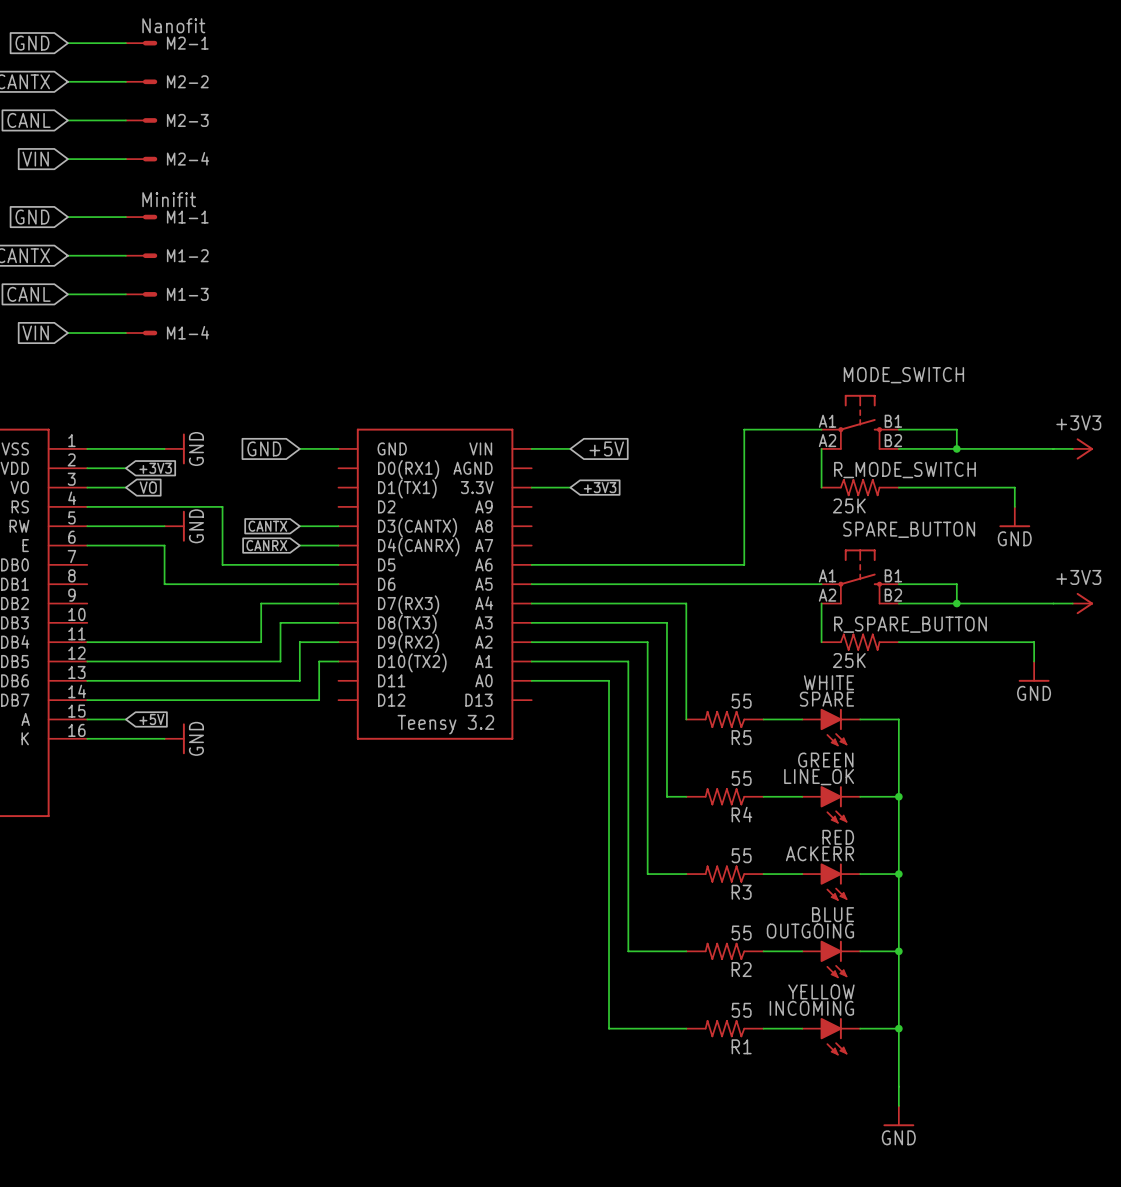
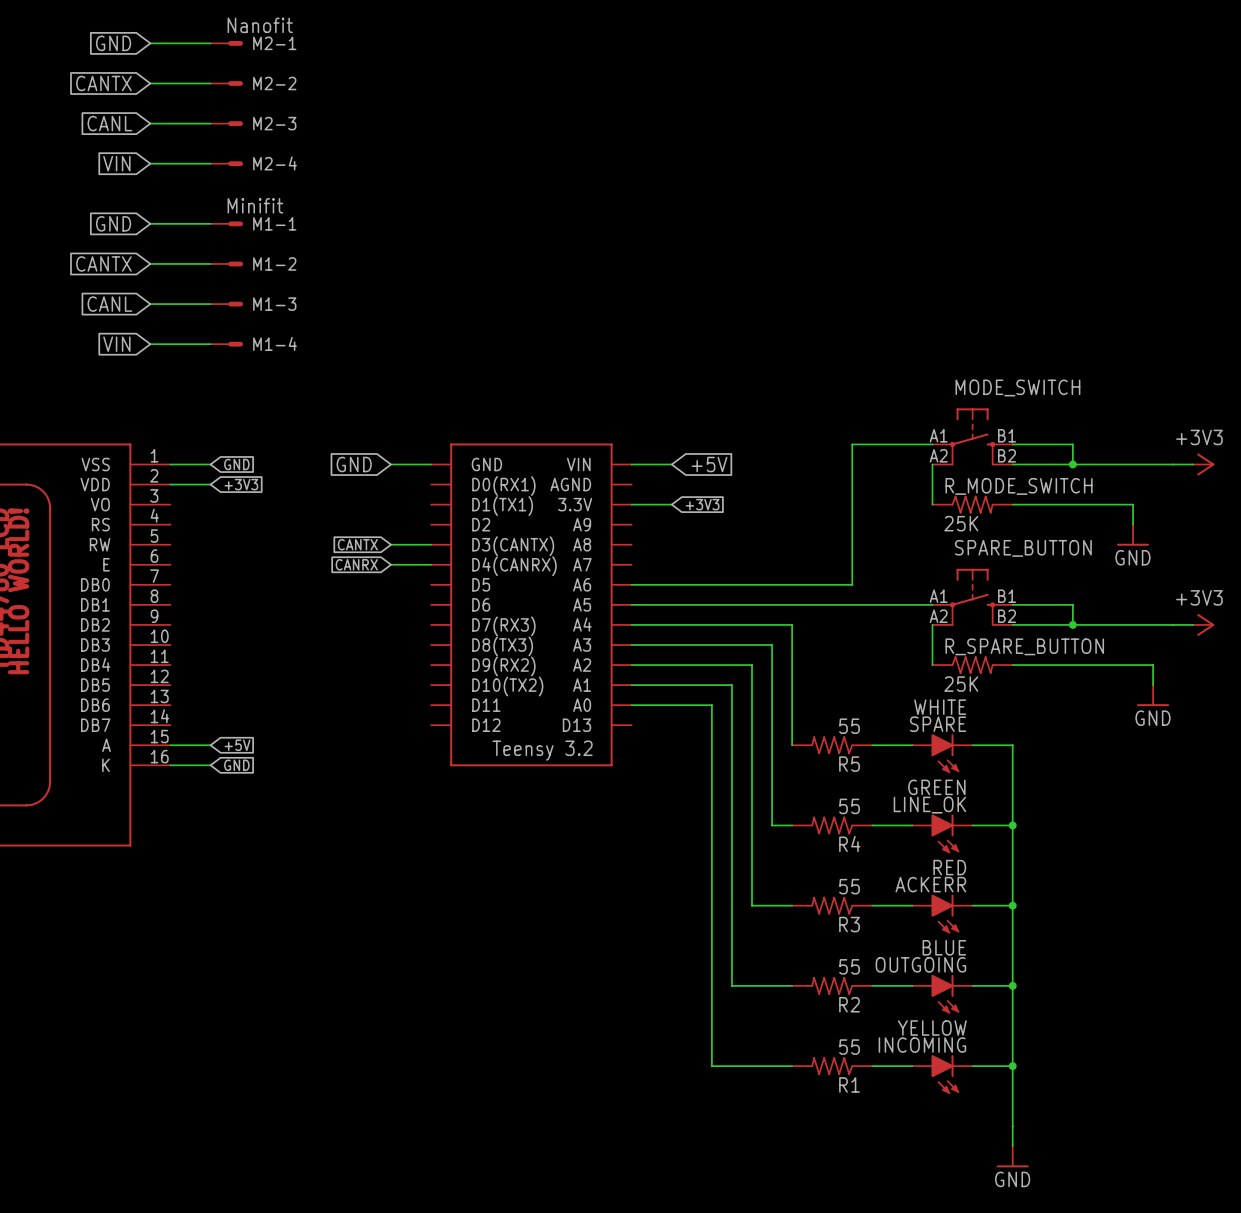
wire: (125, 448) (164, 448) -> none
global label: none -> GND (236, 464)
power symbol: GND (174, 448) -> none
wire: (87, 487) (125, 487) -> none
global label: VO (148, 487) -> none
wire: (87, 506) (222, 506) (222, 564) (338, 564) -> none
wire: (87, 526) (164, 526) -> none
power symbol: GND (174, 526) -> none
wire: (87, 545) (164, 545) (164, 584) (338, 584) -> none
wire: (338, 603) (261, 603) (261, 642) (87, 642) -> none
wire: (338, 622) (280, 622) (280, 661) (87, 661) -> none
wire: (338, 642) (299, 642) (299, 680) (87, 680) -> none
wire: (338, 661) (319, 661) (319, 700) (87, 700) -> none
wire: (125, 738) (164, 738) -> none
global label: none -> GND (236, 765)
power symbol: GND (174, 738) -> none

